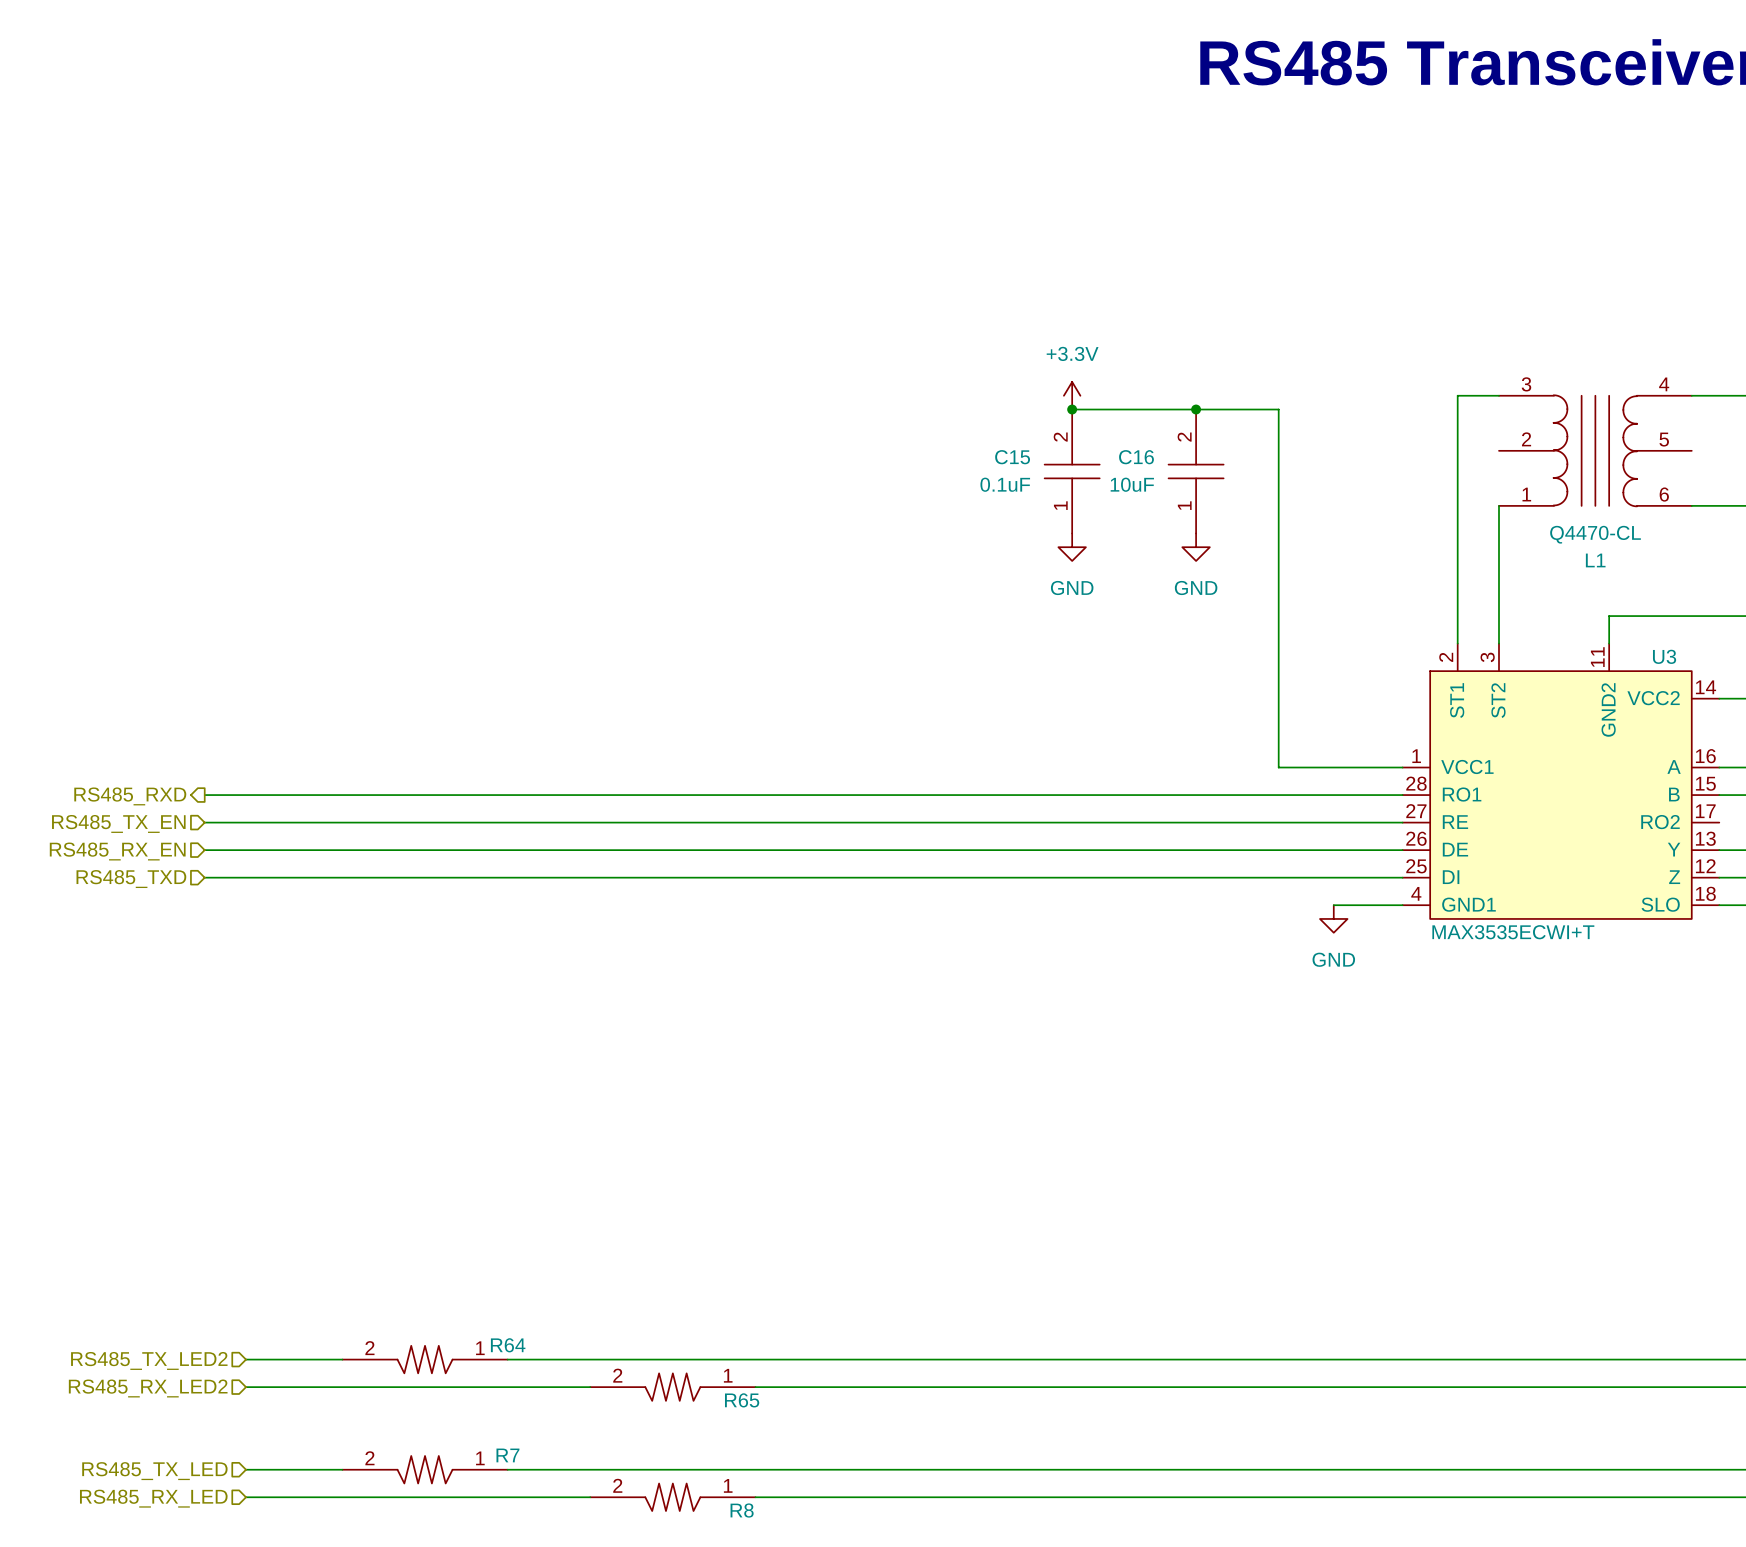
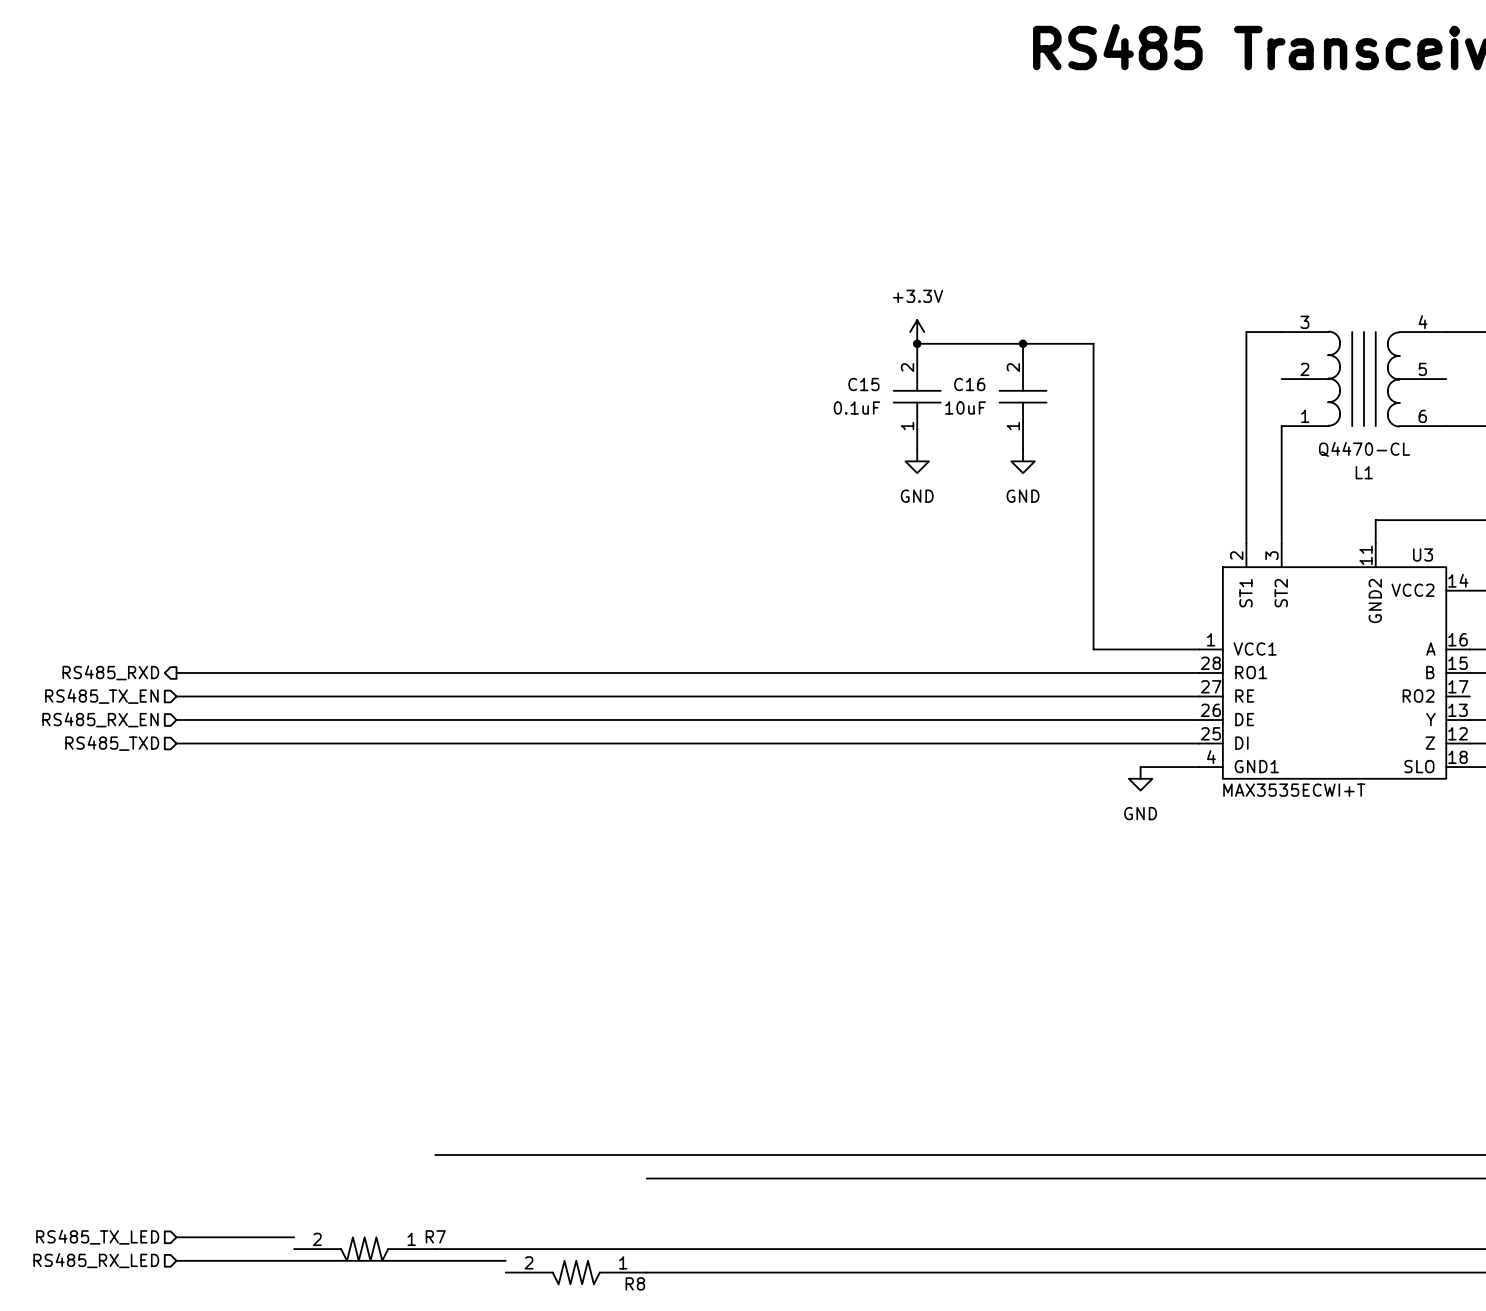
wire: (246, 1359) (342, 1359) -> none
R64: (425, 1359) -> none
hierarchical label: RS485_TX_LED2 (149, 1360) -> none
wire: (246, 1387) (590, 1387) -> none
R65: (672, 1387) -> none
hierarchical label: RS485_RX_LED2 (148, 1388) -> none
wire: none -> (176, 1237) (294, 1237)
wire: (246, 1469) (342, 1469) -> none
hierarchical label position: RS485_TX_LED (154, 1471) -> RS485_TX_LED (97, 1237)
wire: none -> (176, 1260) (505, 1260)
wire: (246, 1497) (590, 1497) -> none
hierarchical label position: RS485_RX_LED (153, 1498) -> RS485_RX_LED (96, 1260)

